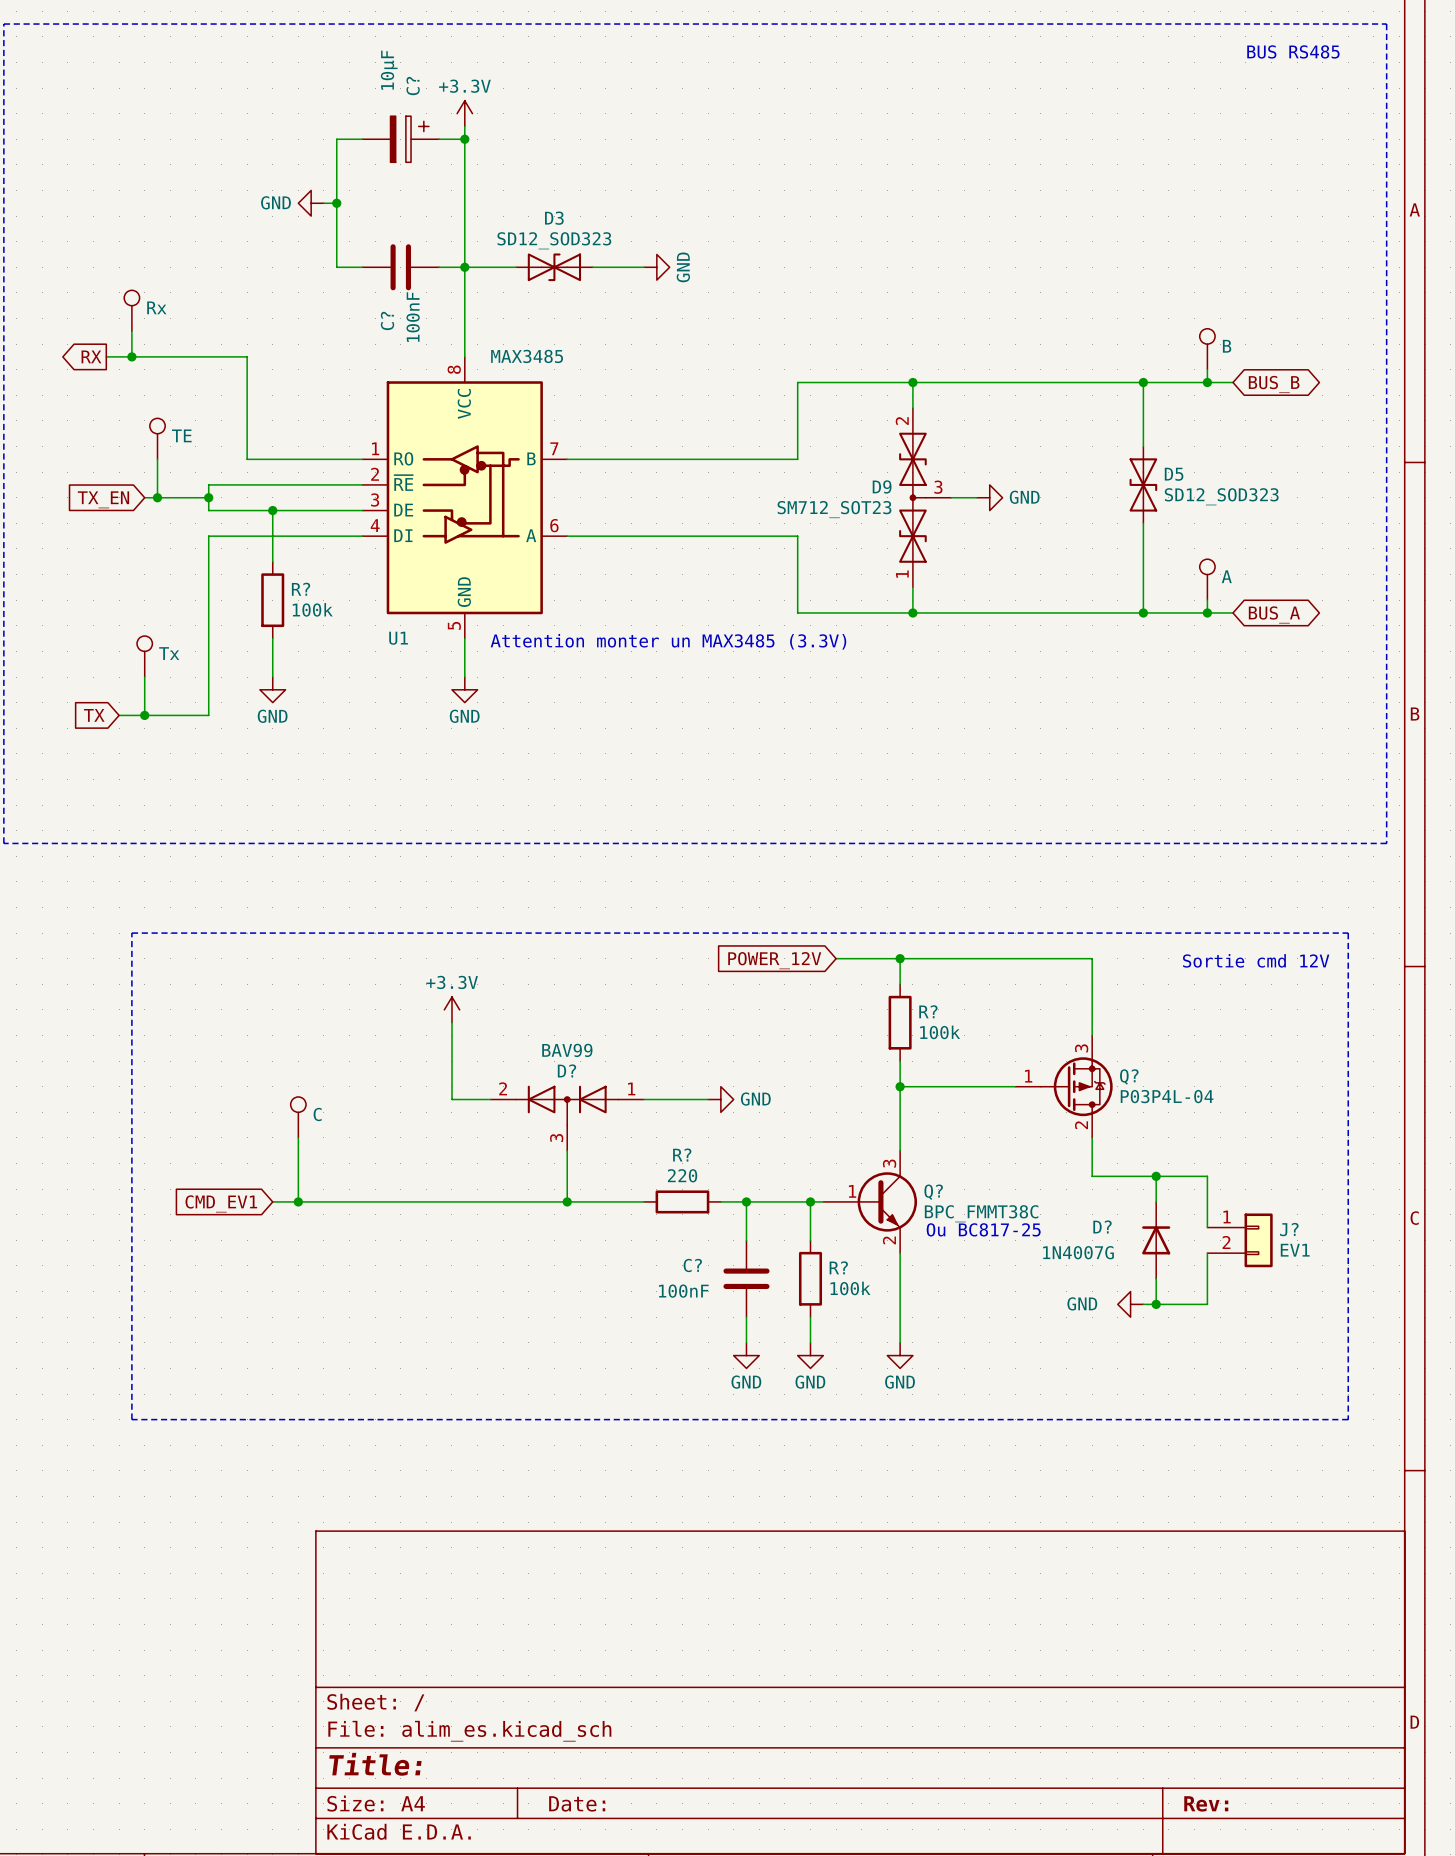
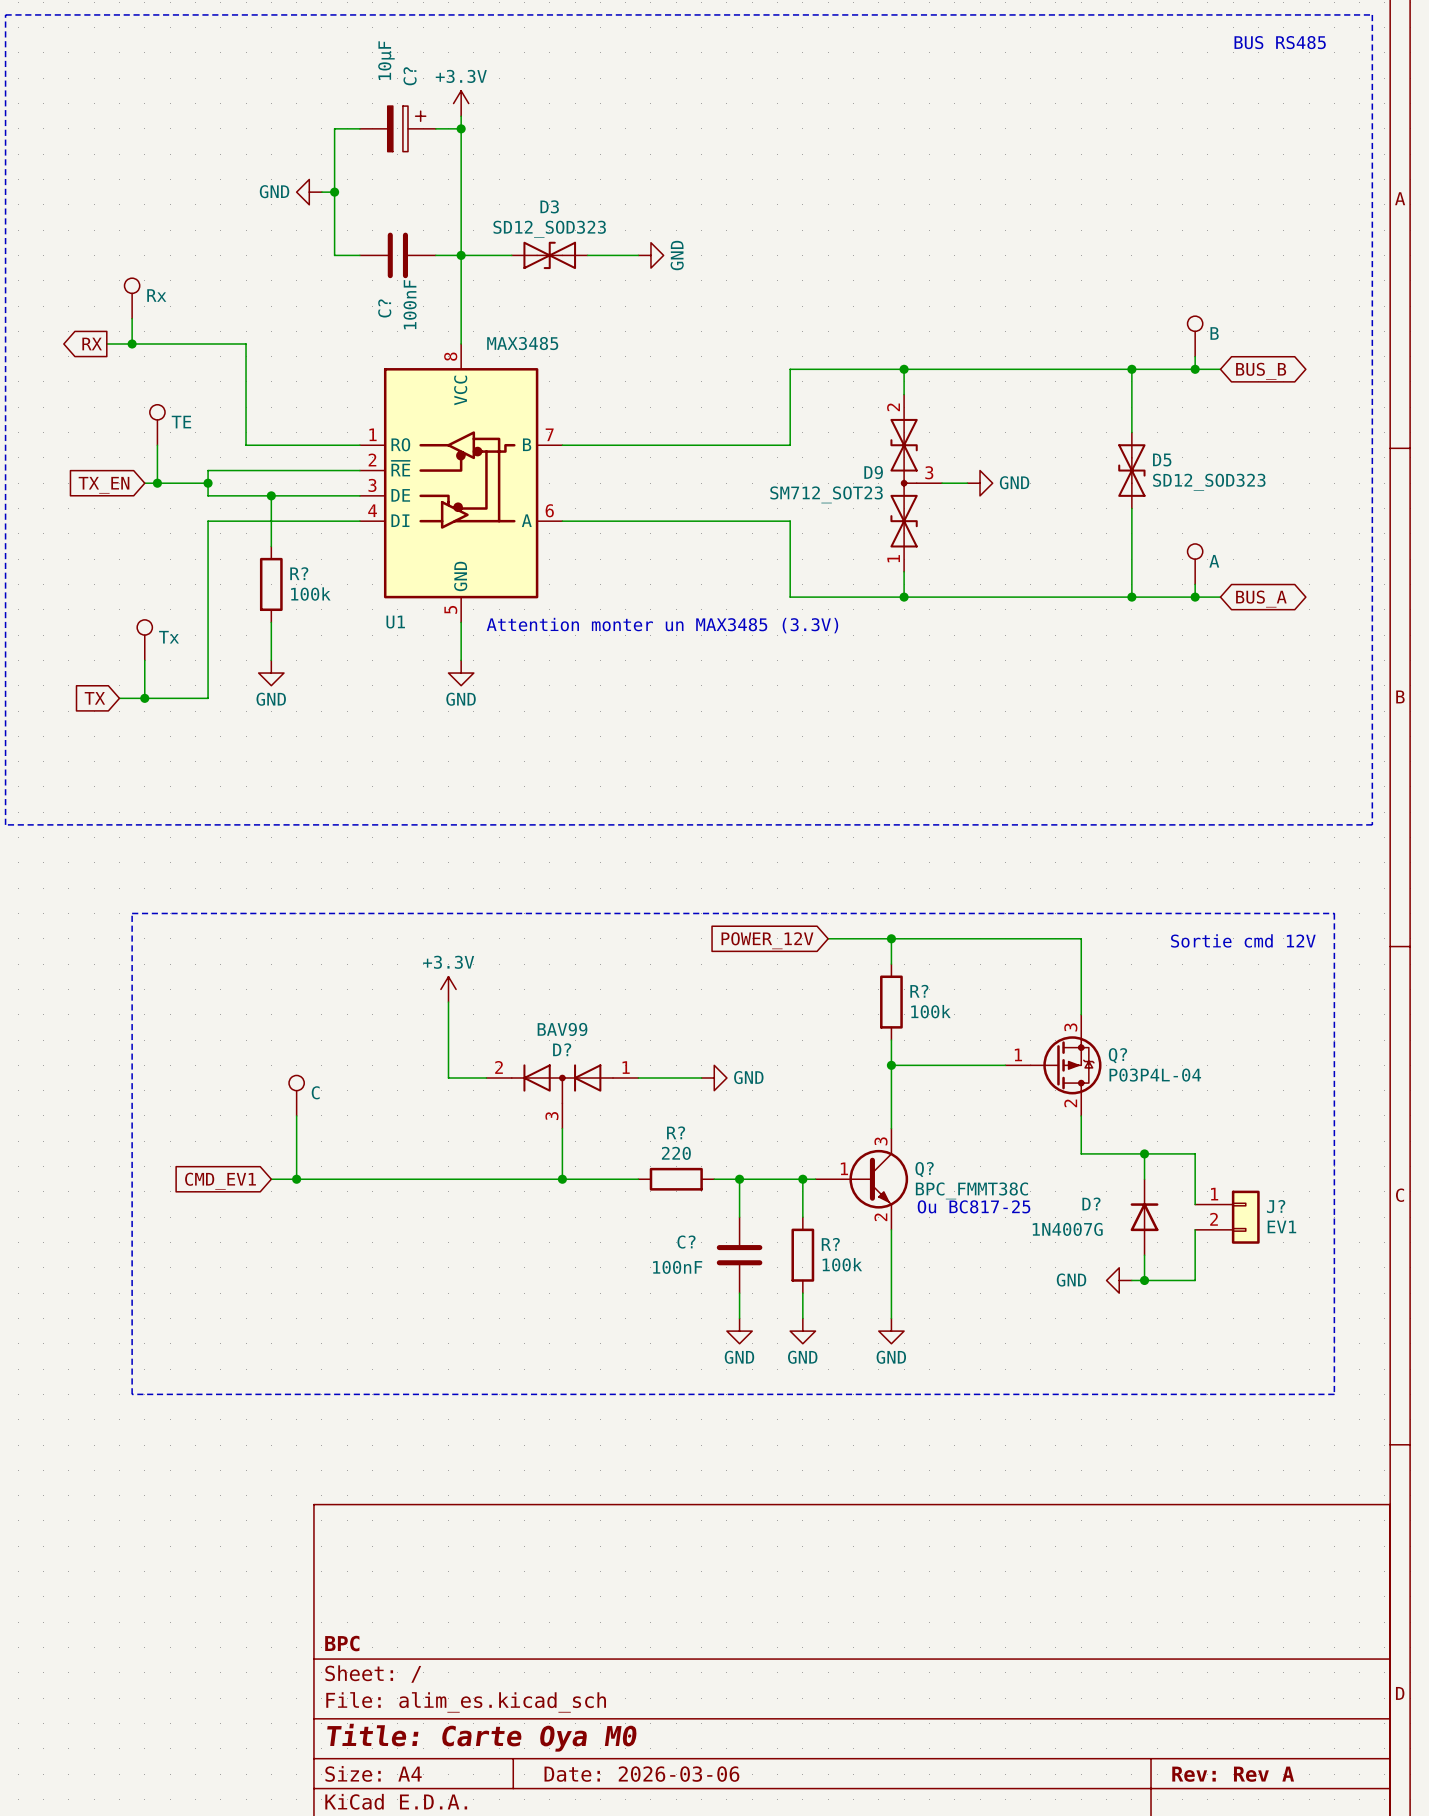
title block: none -> BPC (342, 1643)
title block: Title: (375, 1764) -> Title: Carte Oya M0 (482, 1737)
title block: Date: (577, 1803) -> Date: 2026-03-06 (641, 1774)
title block: Rev: (1206, 1803) -> Rev: Rev A (1233, 1774)

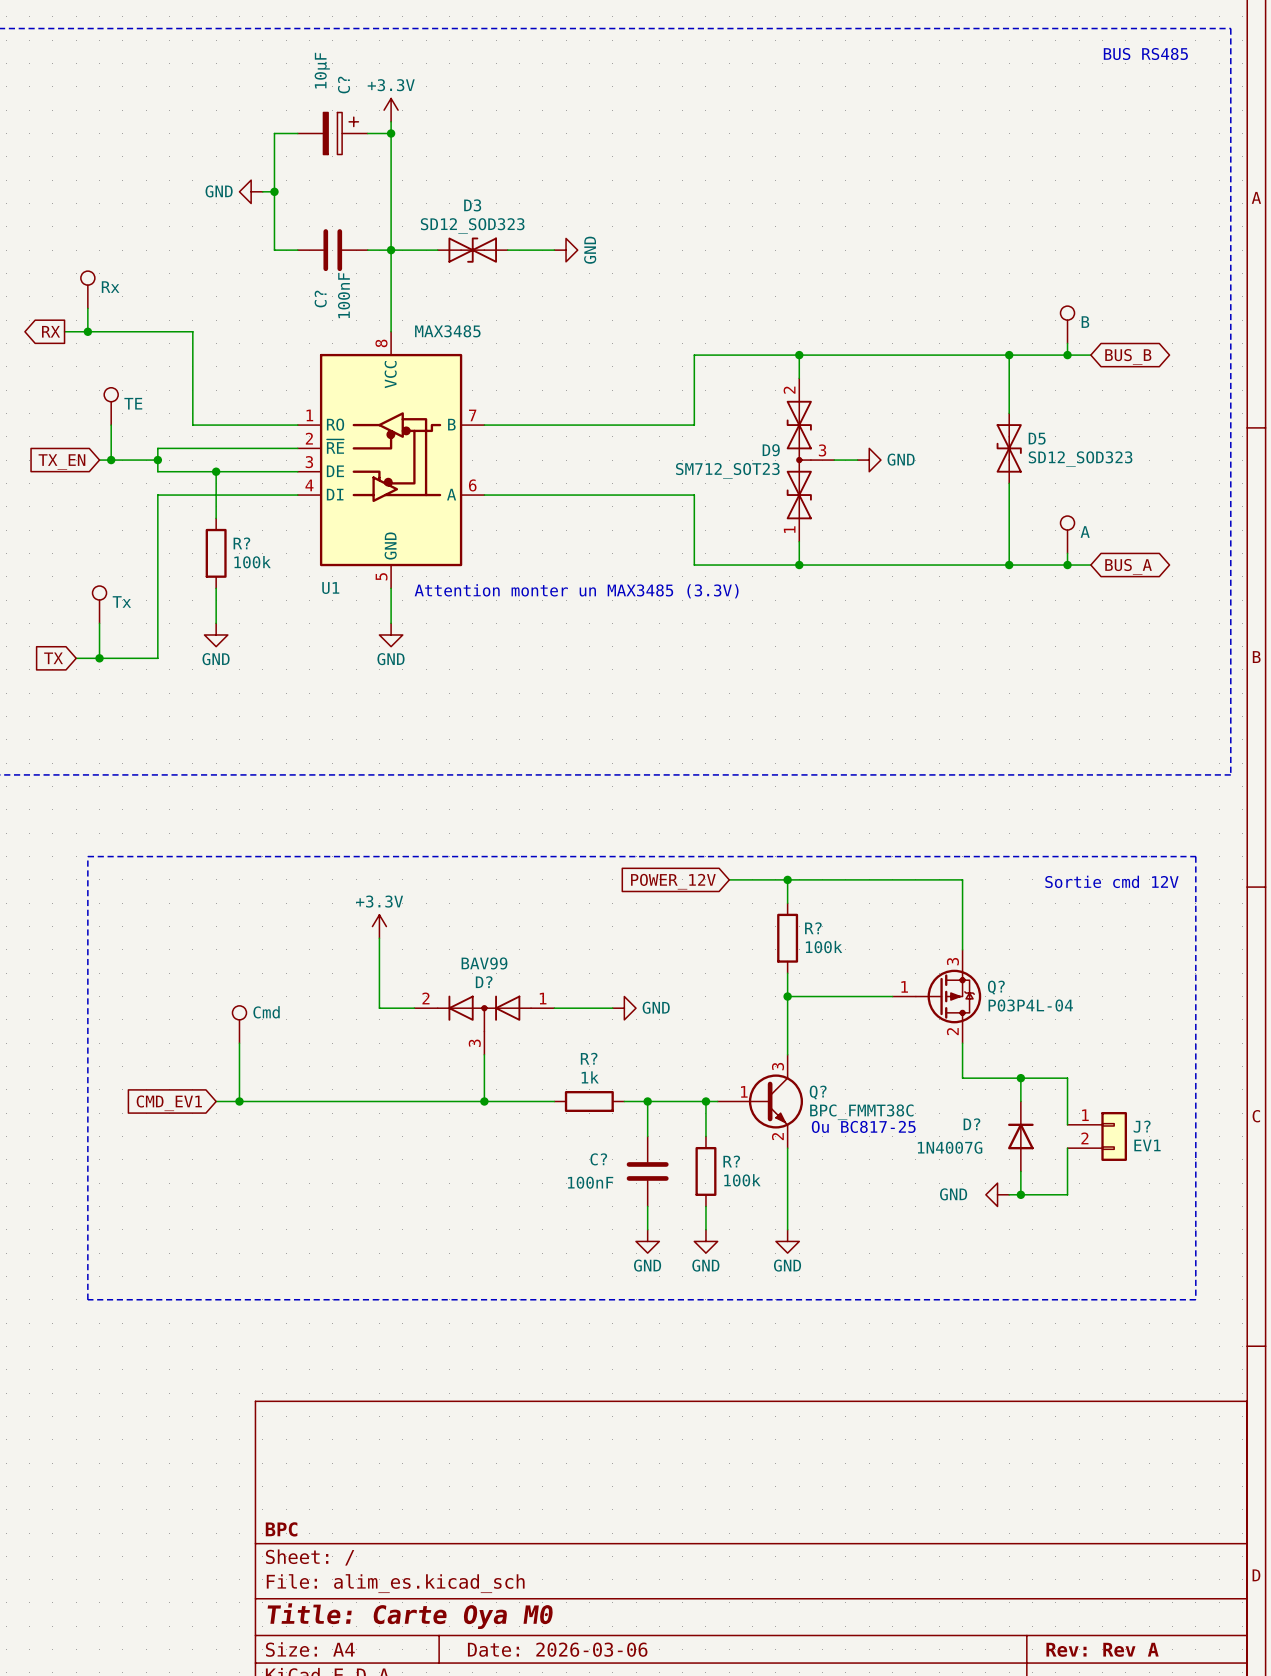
part value: C (315, 1092) -> Cmd (266, 1012)
R? value: 220 (676, 1153) -> 1k (590, 1077)

